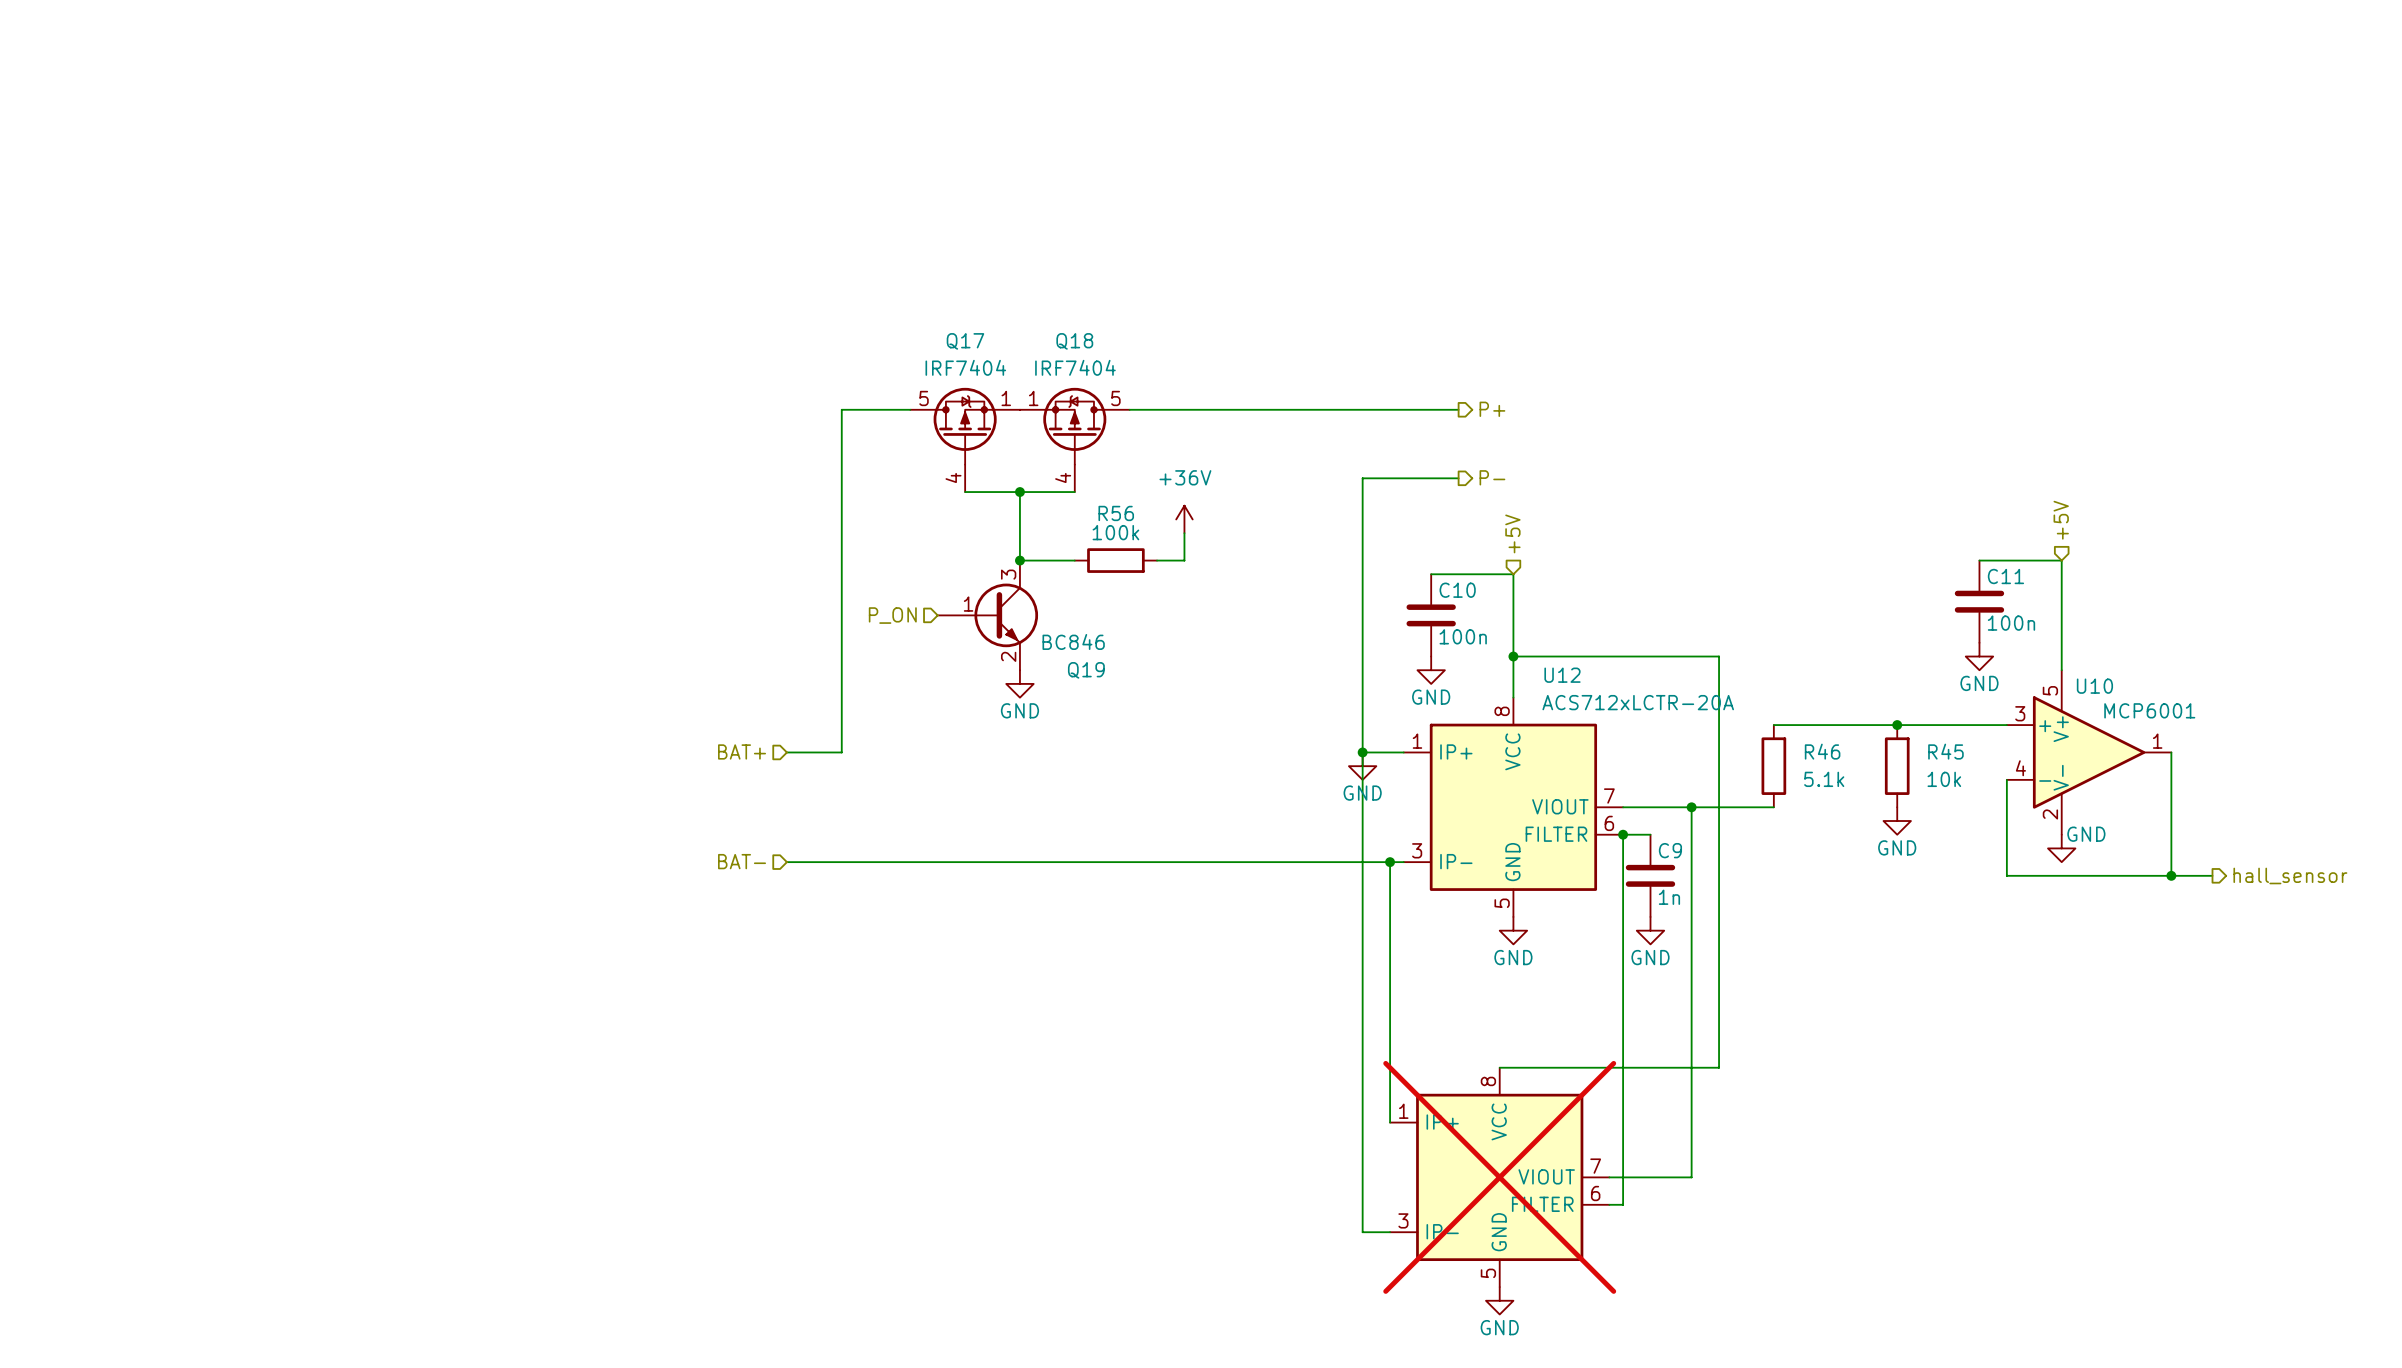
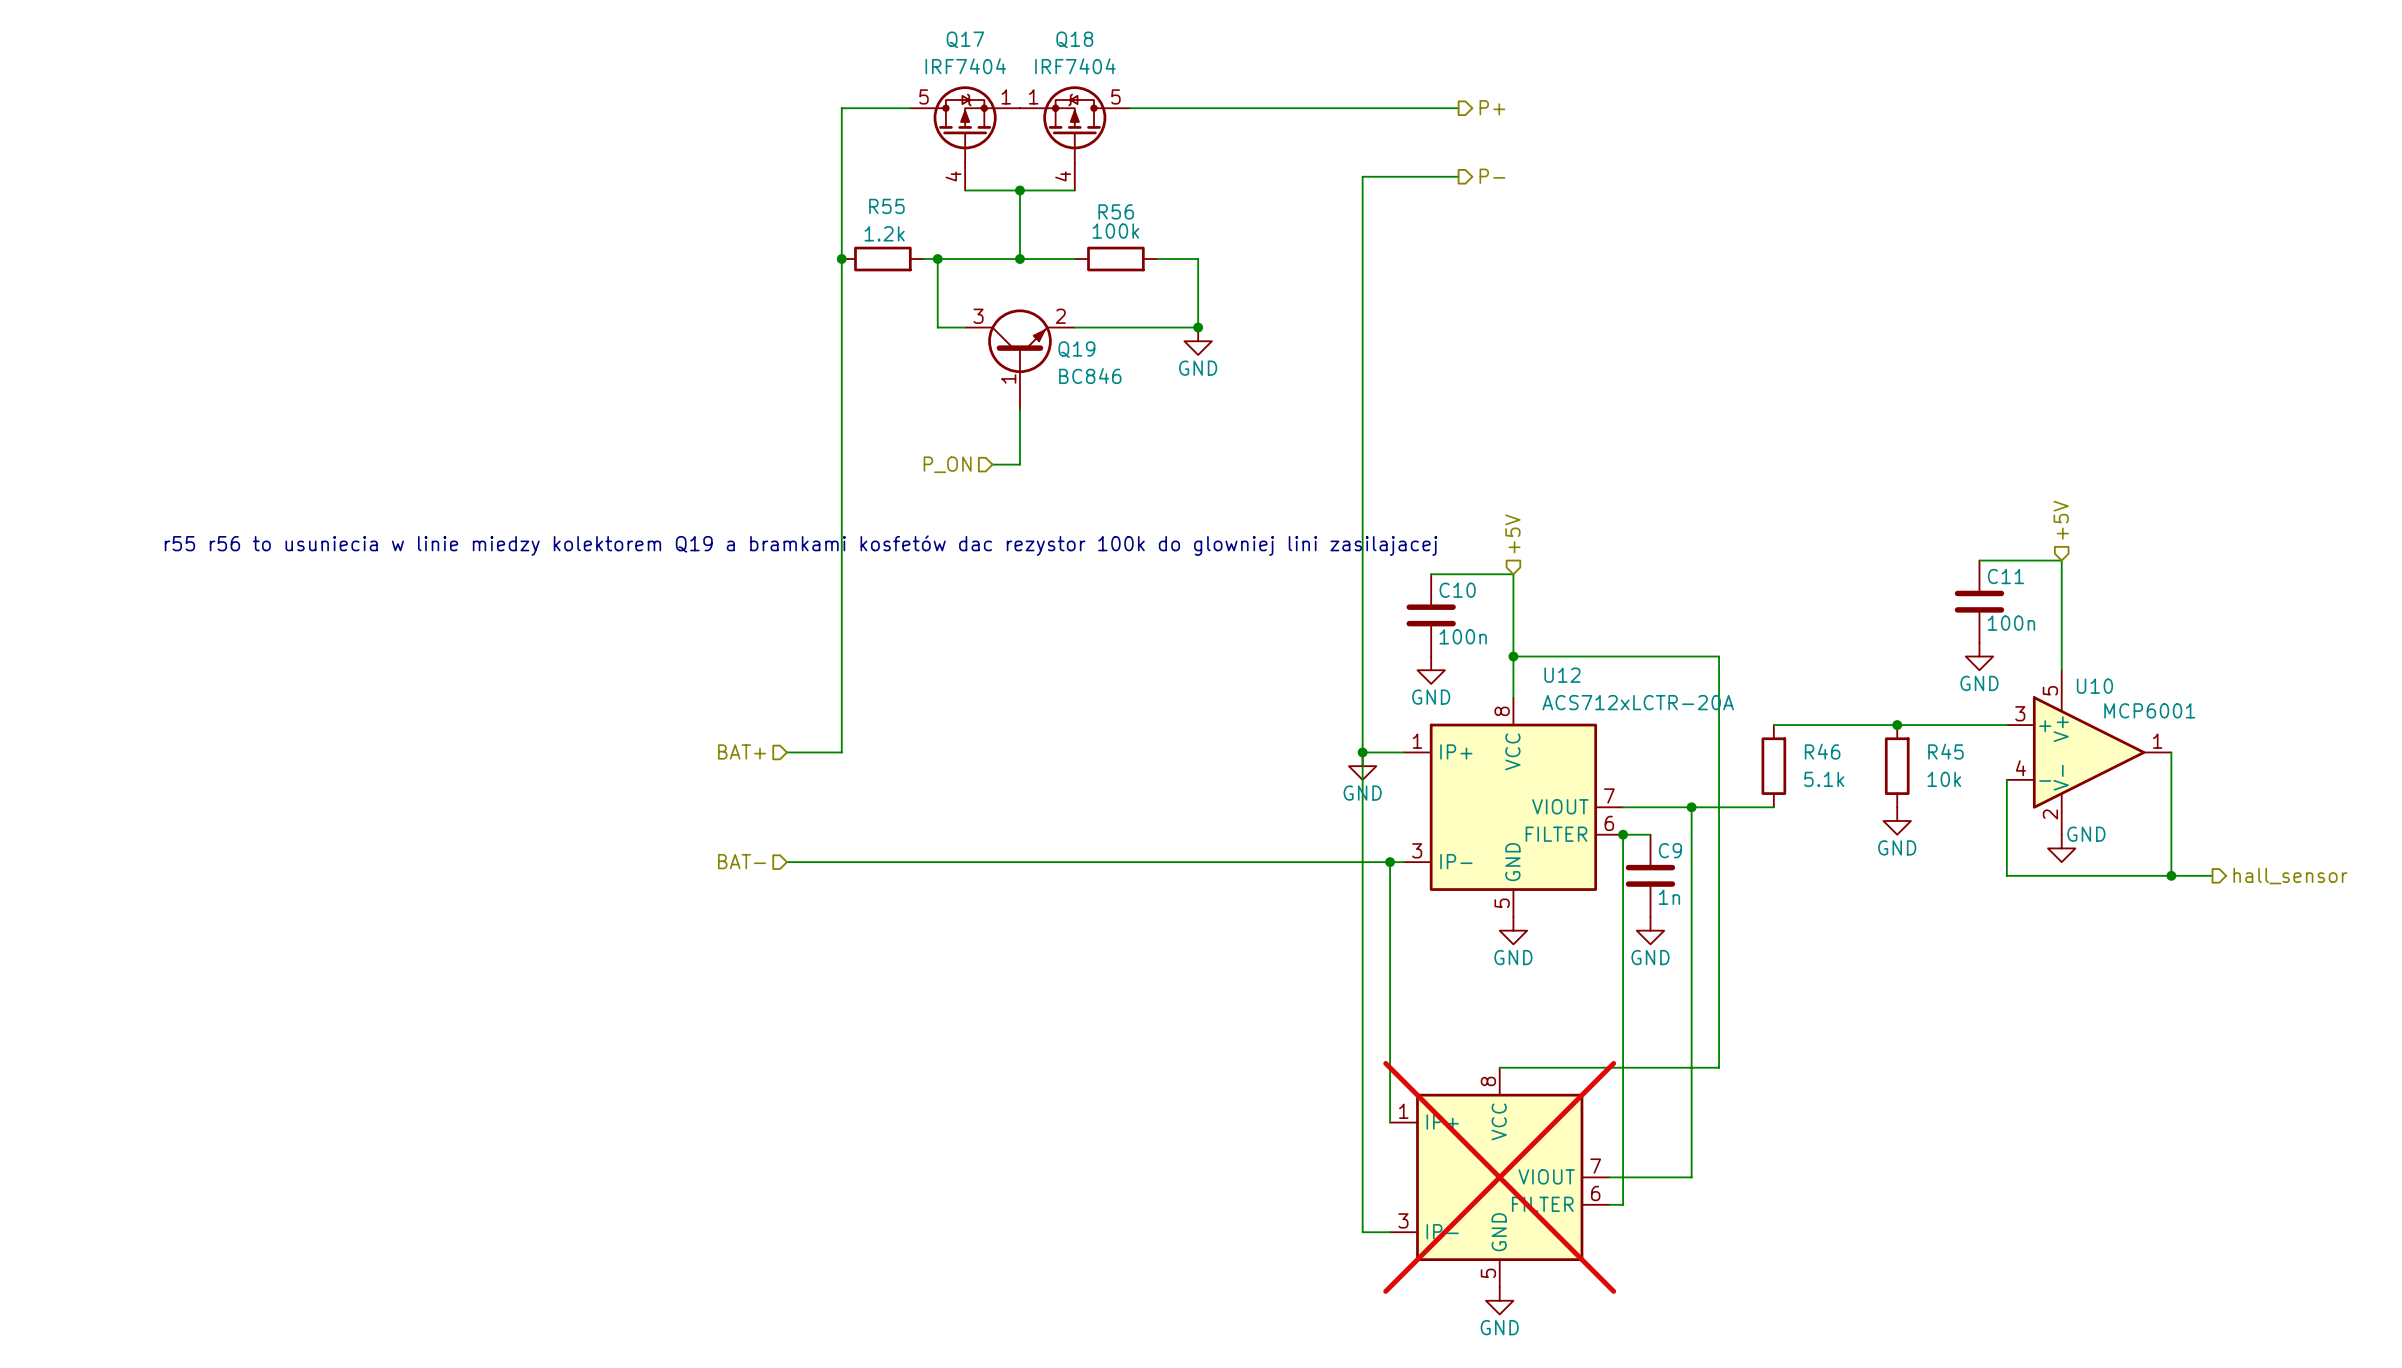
hierarchical label: none -> P+ (1492, 107)
wire: none -> (1129, 108) (1458, 108)
hierarchical label: none -> P- (1492, 176)
wire: none -> (965, 190) (1074, 190)
wire: none -> (1019, 190) (1019, 259)
junction: none -> (1019, 190)
junction: none -> (841, 259)
R55: none -> 1.2k (882, 259)
wire: none -> (924, 259) (1074, 259)
wire: none -> (937, 259) (937, 327) (965, 327)
junction: none -> (937, 259)
junction: none -> (1019, 259)
wire: none -> (1157, 259) (1198, 259) (1198, 327) (1074, 327)
junction: none -> (1198, 327)
power symbol: none -> GND (1198, 341)
wire: (841, 409) (910, 409) -> (841, 409) (841, 108) (910, 108)
wire: none -> (1019, 409) (1019, 464) (992, 464)
wire: (1129, 409) (1458, 409) -> none
hierarchical label: P+ (1492, 409) -> none
Q17 position: (965, 439) -> (965, 138)
Q18 position: (1074, 439) -> (1074, 138)
hierarchical label: P- (1492, 477) -> none
wire: (1362, 478) (1458, 478) -> (1362, 478) (1362, 176) (1458, 176)
wire: (965, 492) (1074, 492) -> none
wire: (1019, 492) (1019, 560) (1074, 560) -> none
junction: (1019, 492) -> none
power symbol: +36V (1184, 519) -> none
wire: (1184, 533) (1184, 560) (1157, 560) -> none
text: none -> r55 r56 to usuniecia w linie miedzy kolektorem Q19 a bramkami kosfetów dac rezystor 100k do glowniej lini zasilajacej (800, 545)
junction: (1019, 560) -> none
R56 position: (1115, 560) -> (1115, 259)
hierarchical label position: P_ON (892, 615) -> P_ON (947, 464)
Q19 position: (987, 615) -> (1019, 359)
Q19 rotation: 0° (1006, 615) -> 90° counterclockwise (1019, 341)
Q19 name position: Q19 (1086, 670) -> Q19 (1076, 349)
power symbol: GND (1019, 683) -> none

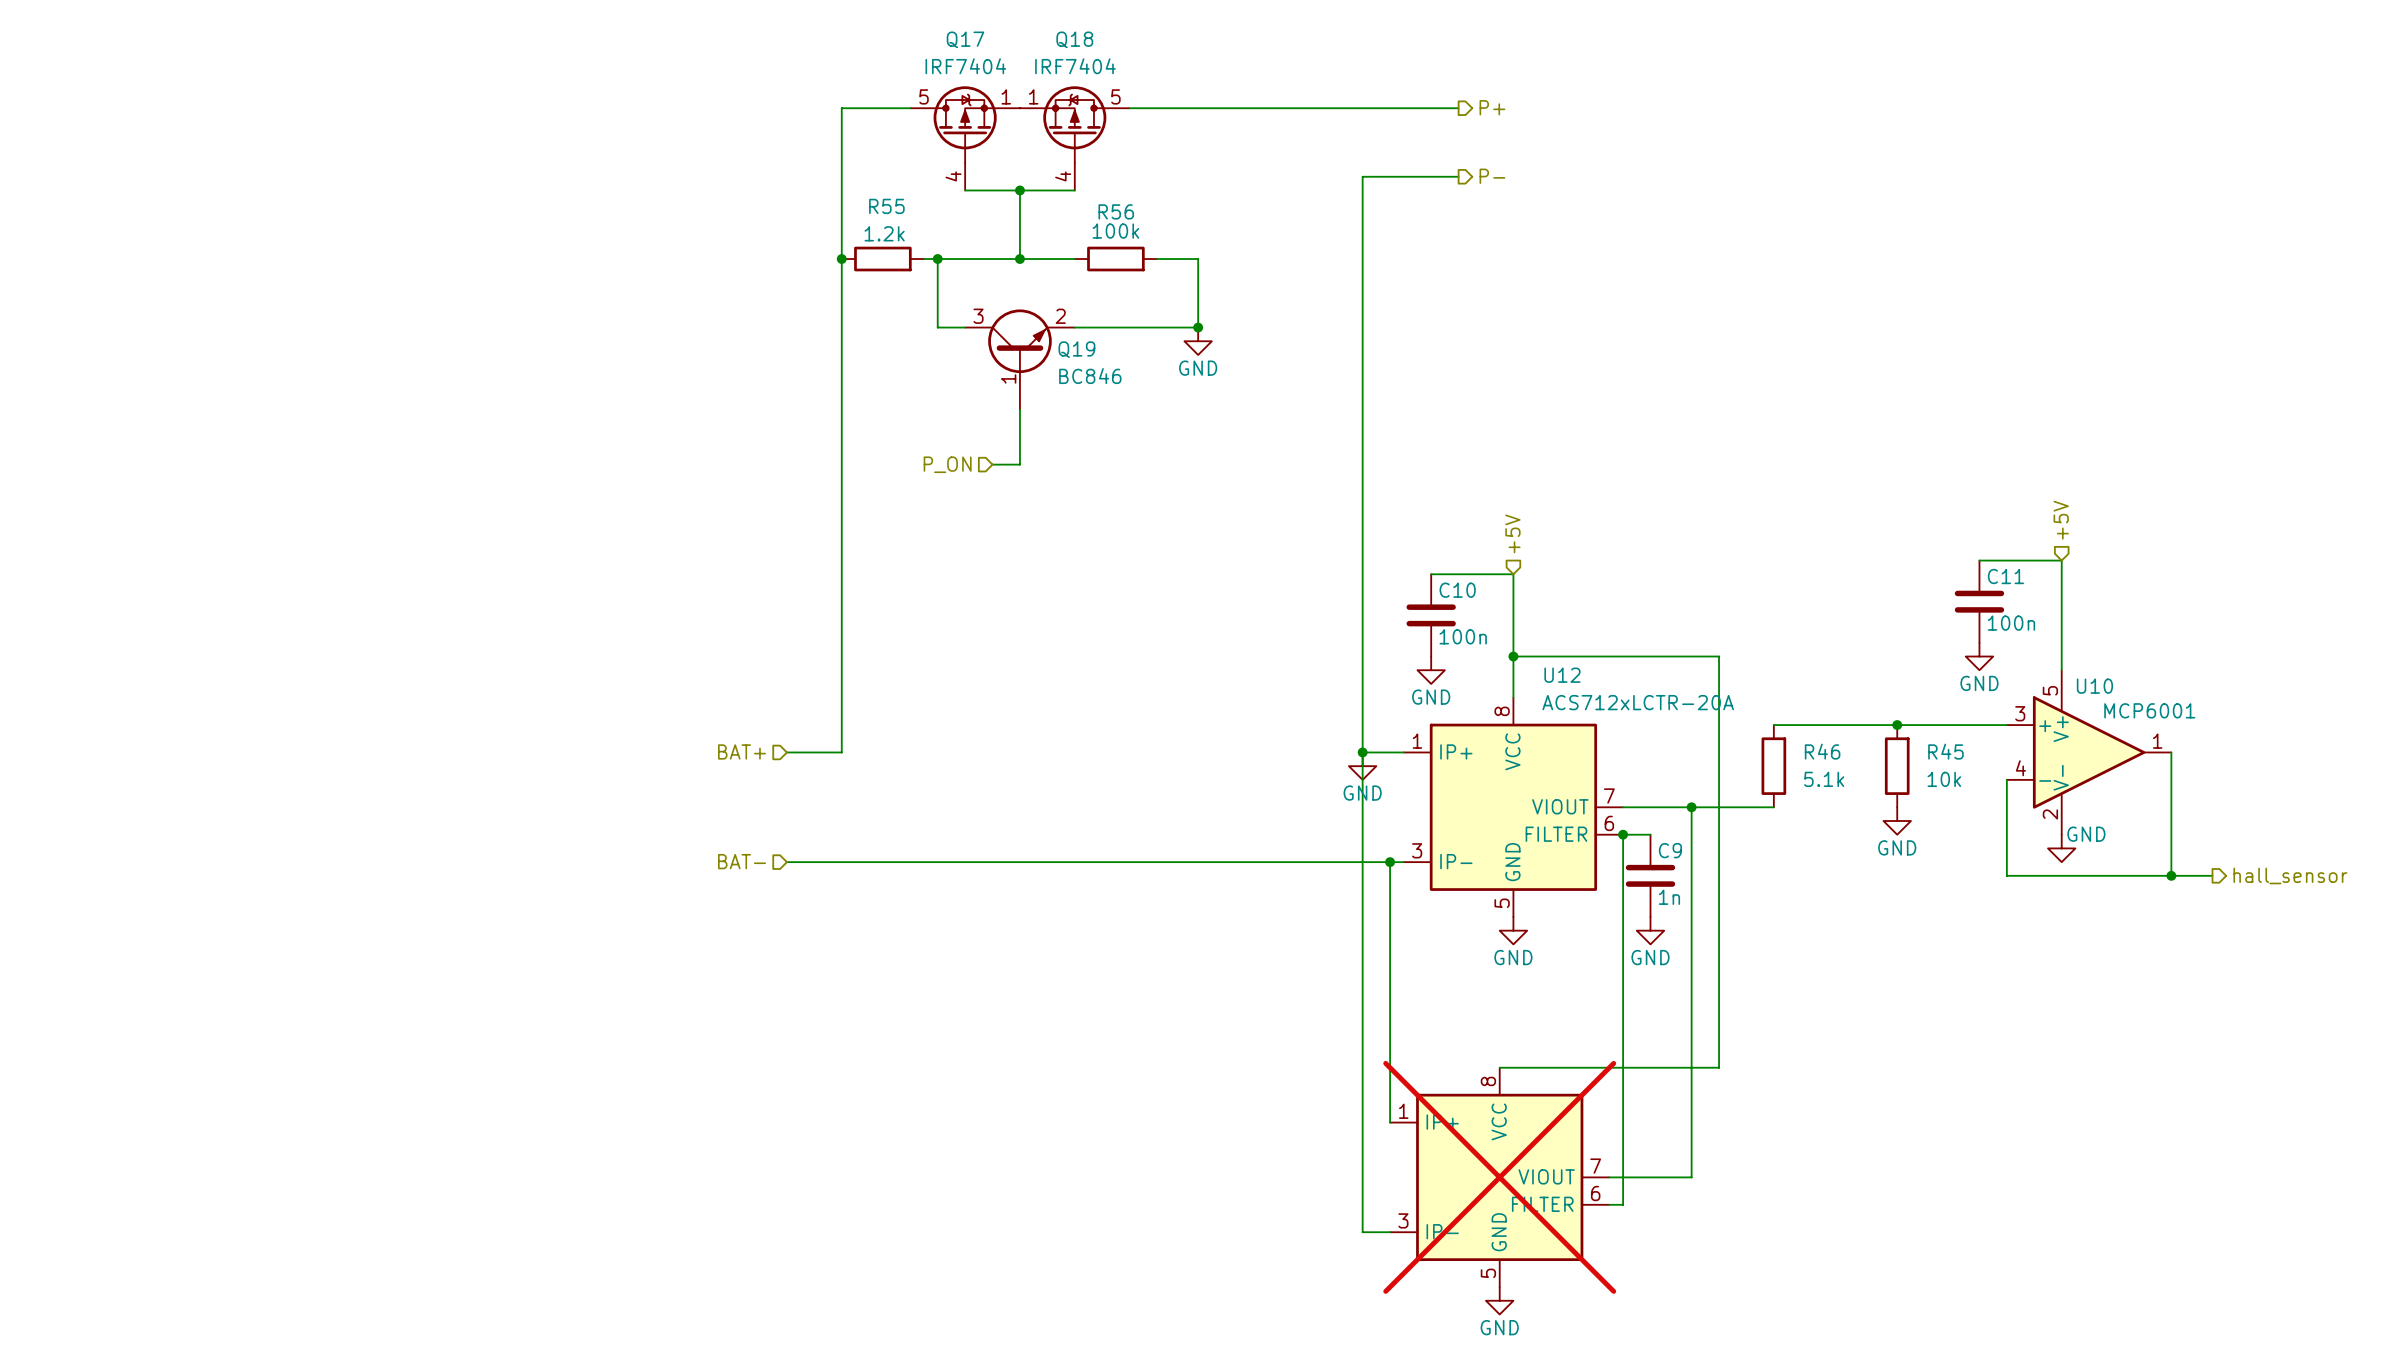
text: r55 r56 to usuniecia w linie miedzy kolektorem Q19 a bramkami kosfetów dac rezystor 100k do glowniej lini zasilajacej (800, 545) -> none

